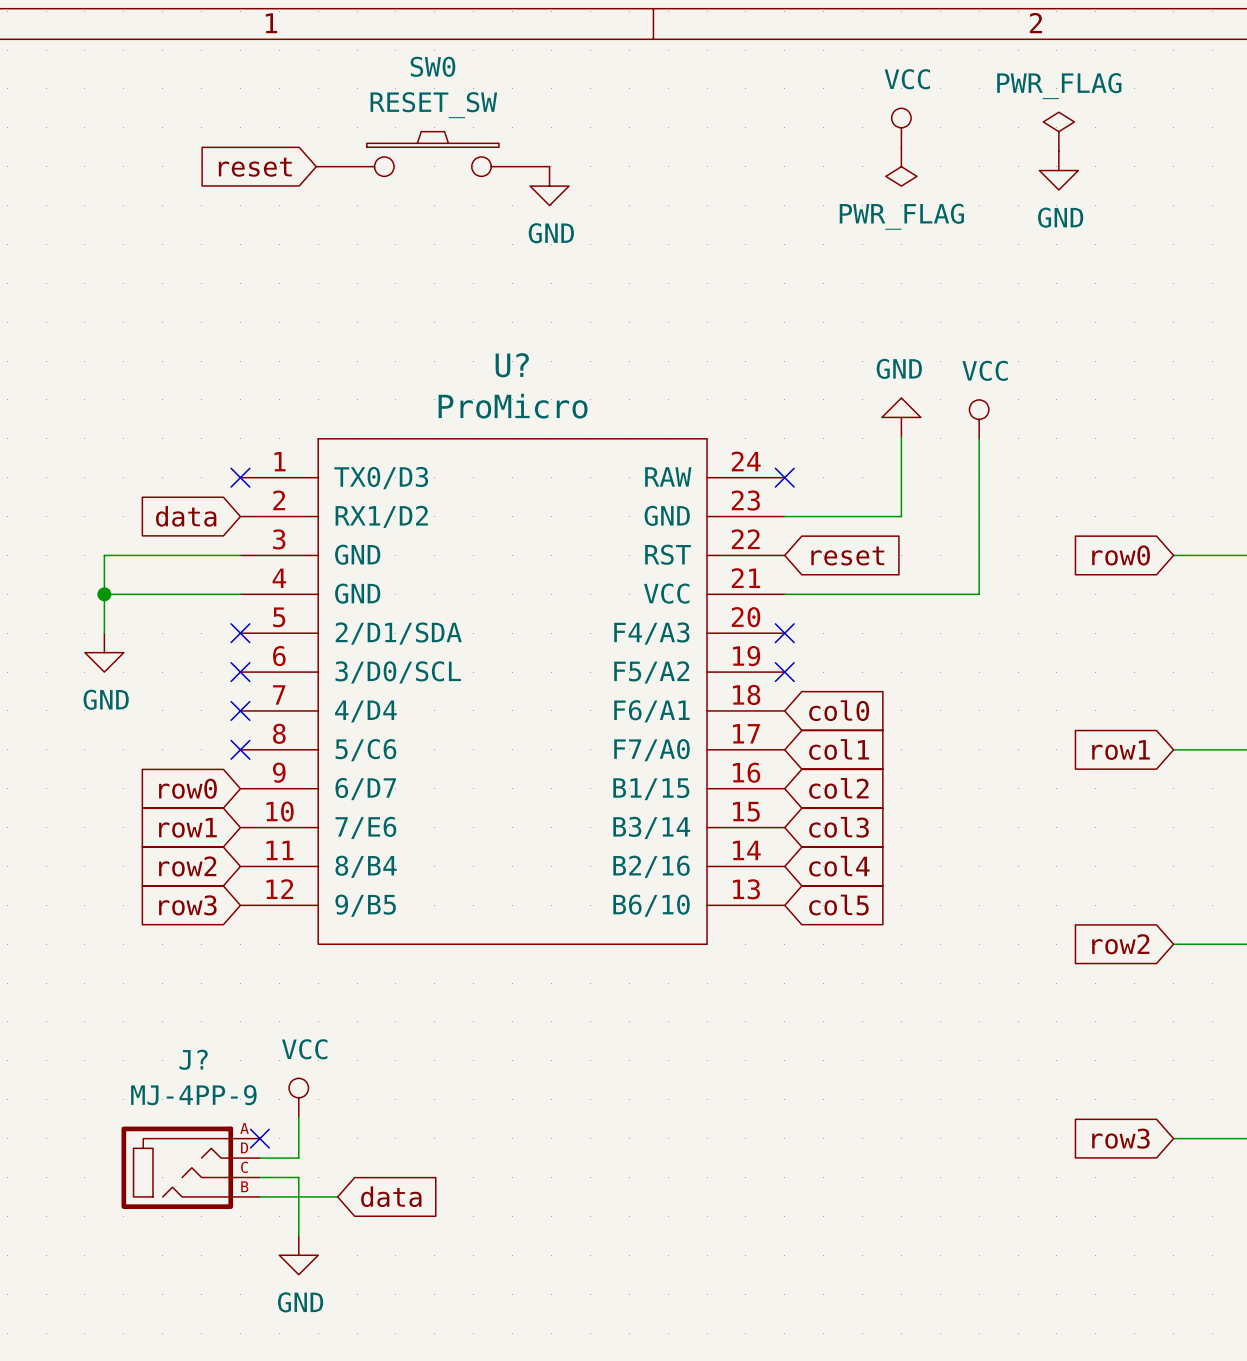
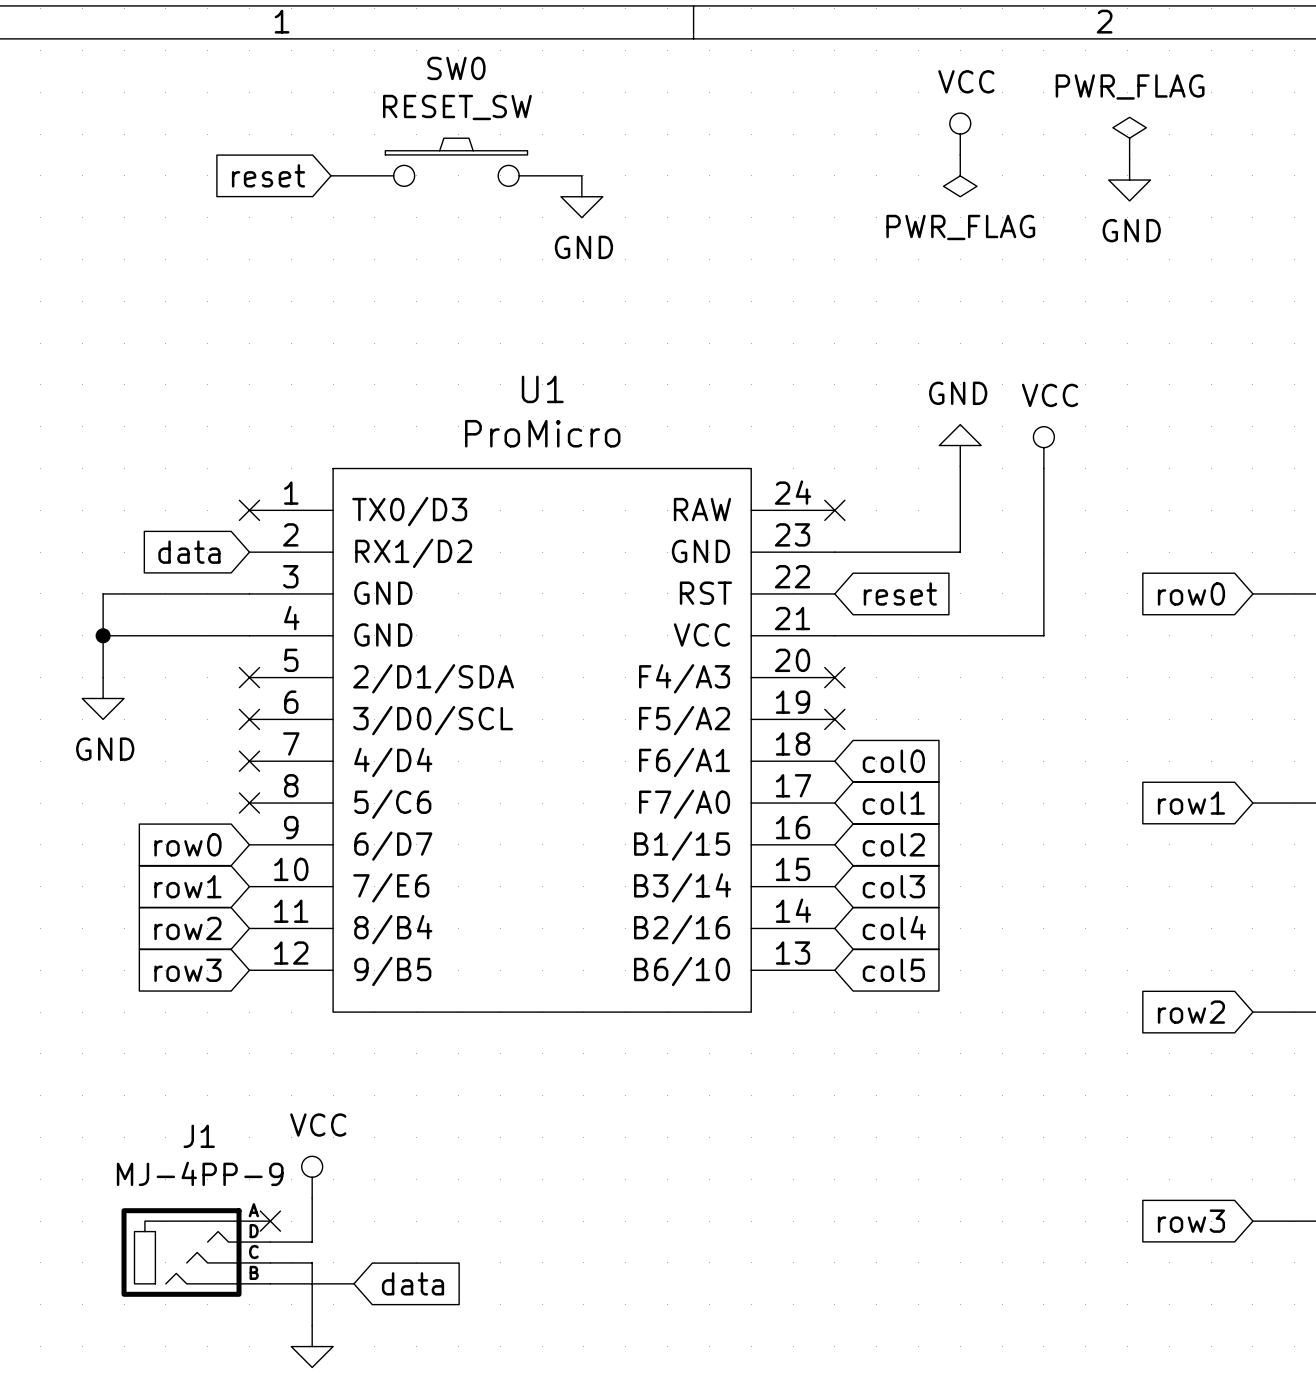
U? name: U? (512, 365) -> U1 (542, 389)
J? name: J? (193, 1059) -> J1 (199, 1136)

